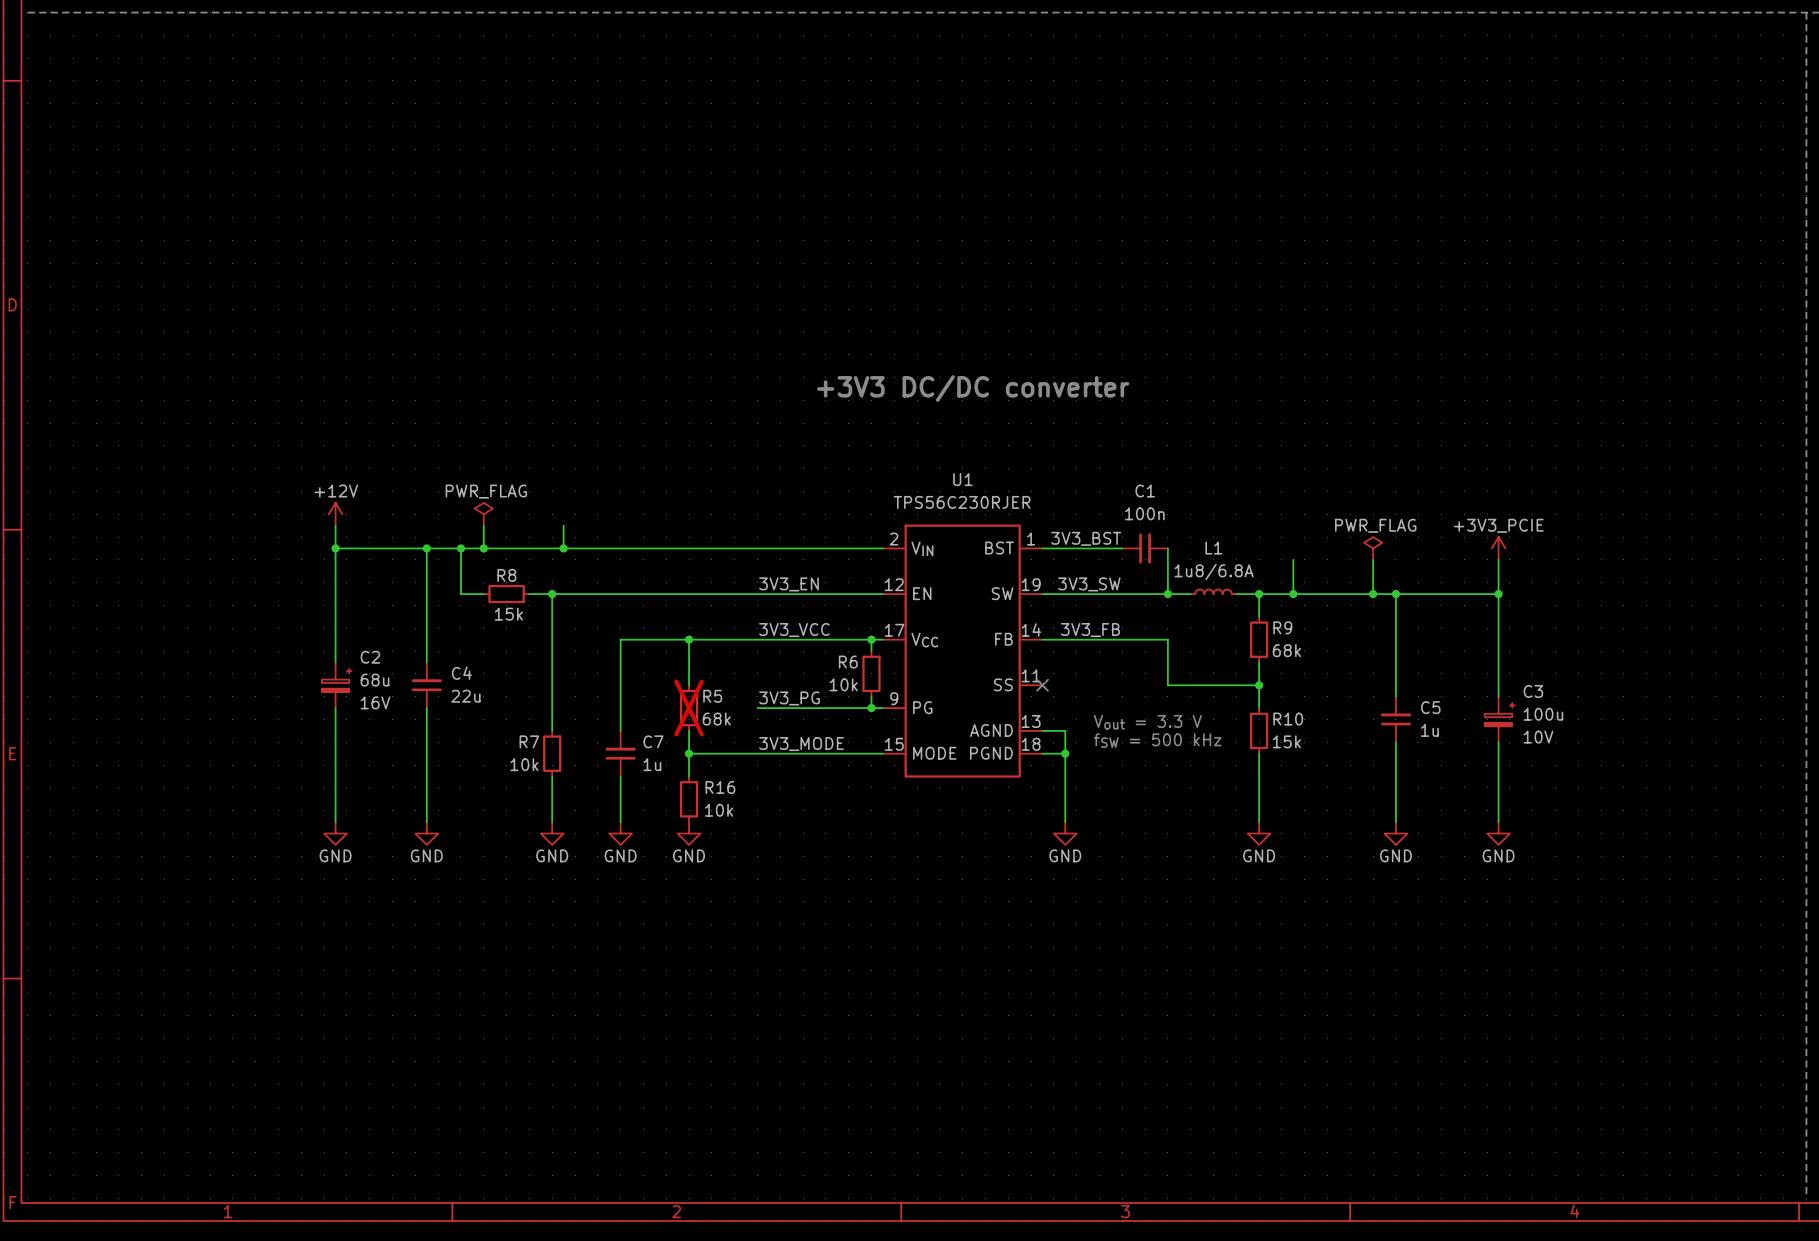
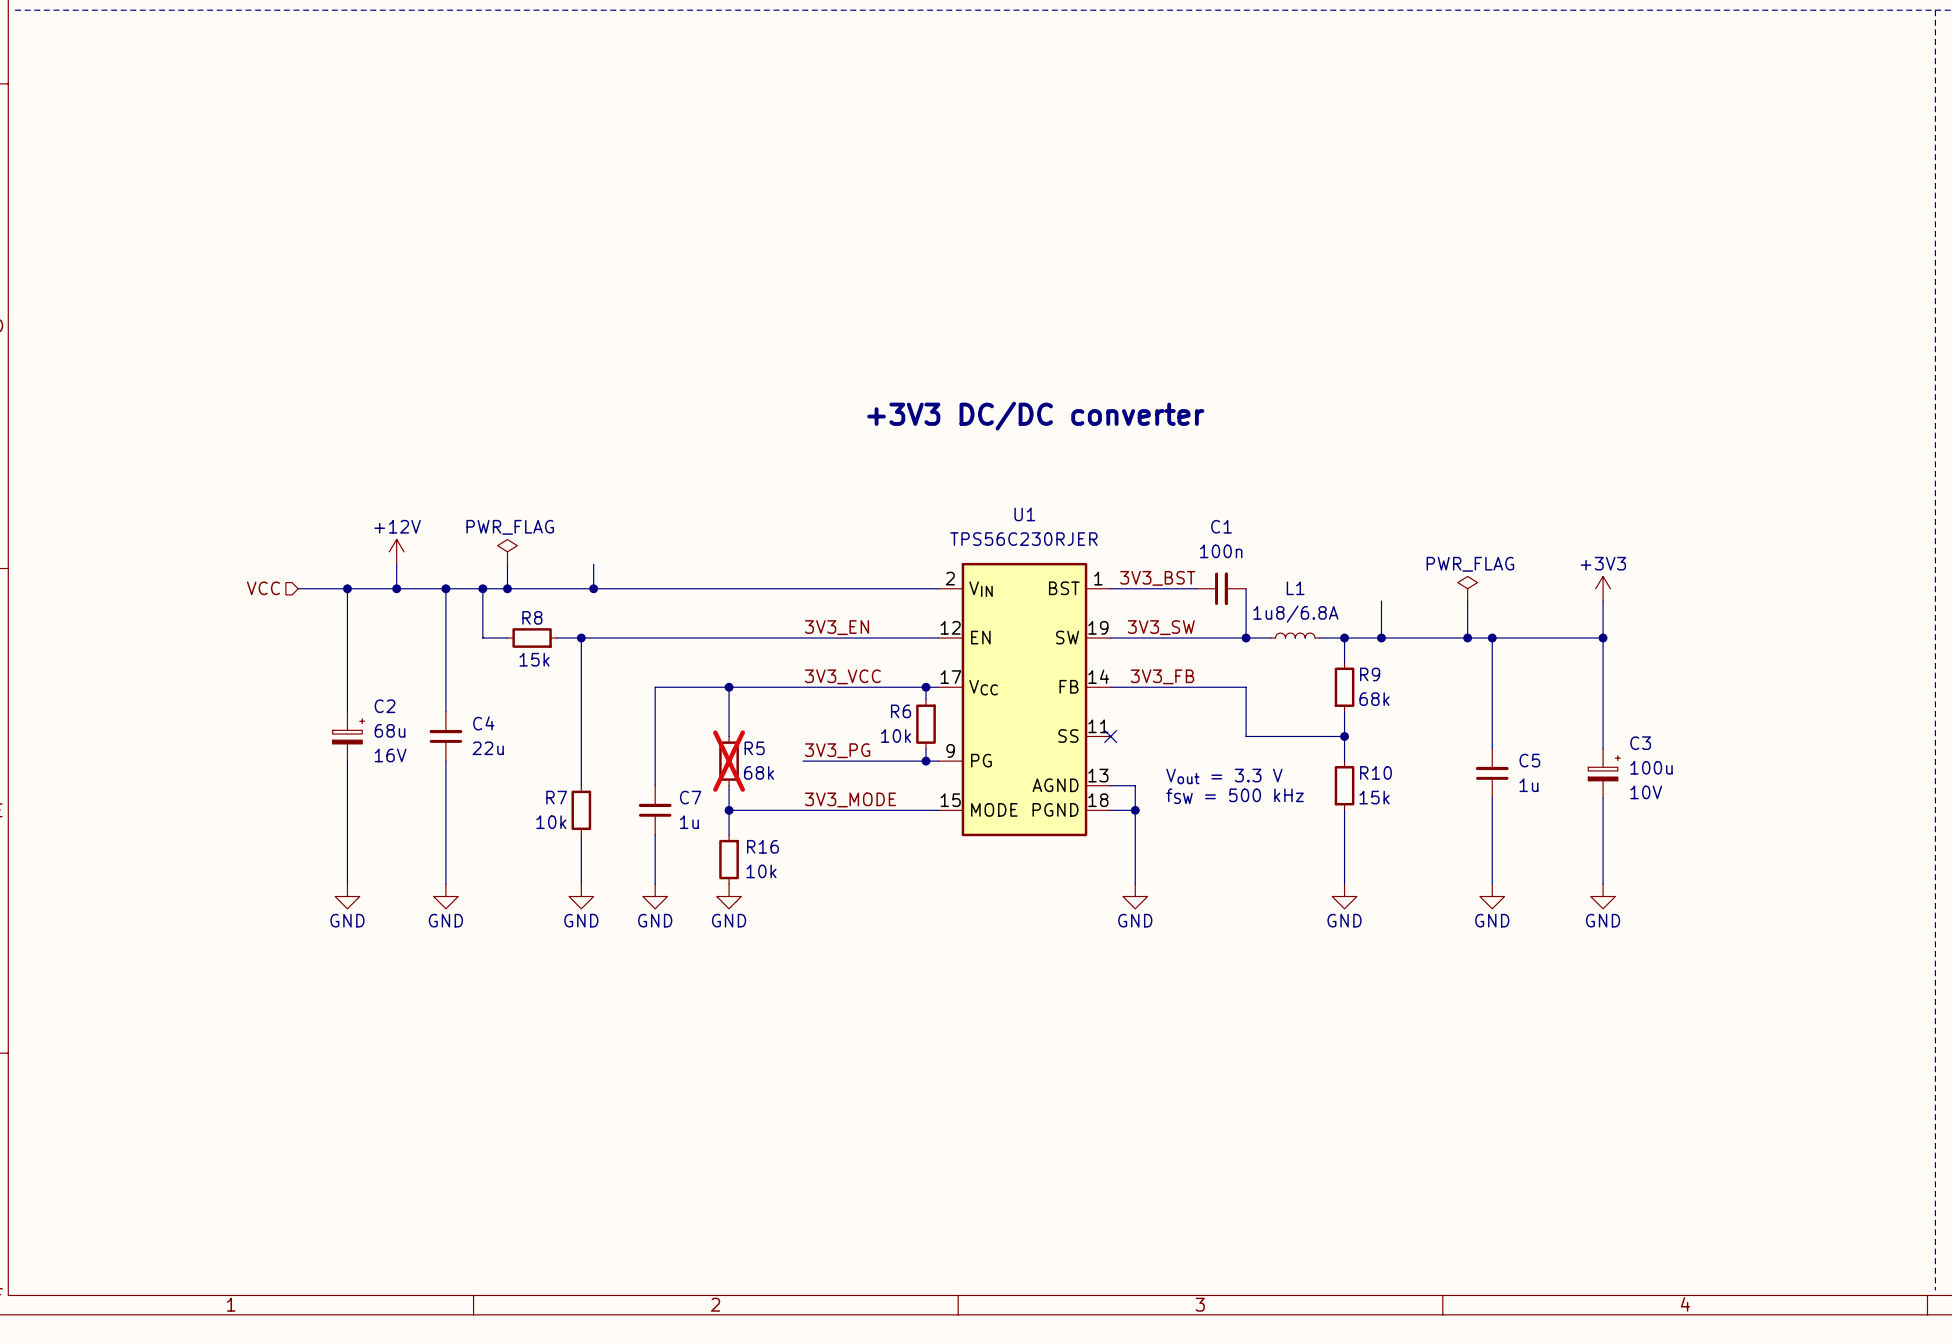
power symbol position: +12V (335, 514) -> +12V (396, 551)
wire: (335, 525) (335, 548) -> (298, 588) (347, 588)
wire: none -> (396, 564) (396, 588)
hierarchical label: none -> VCC (263, 588)
junction: none -> (396, 588)
power symbol: +3V3_PCIE (1498, 548) -> +3V3 (1603, 588)

